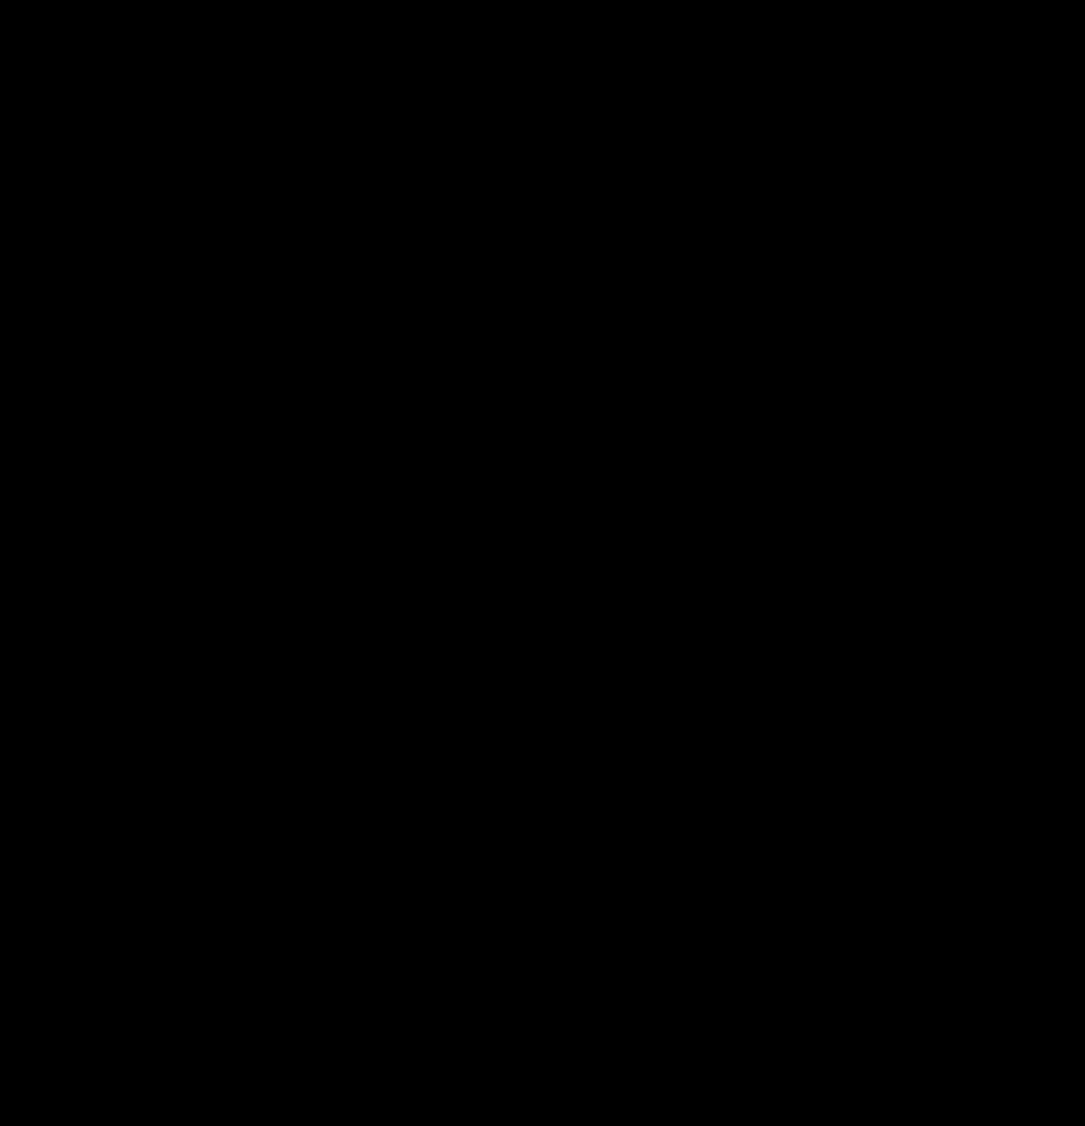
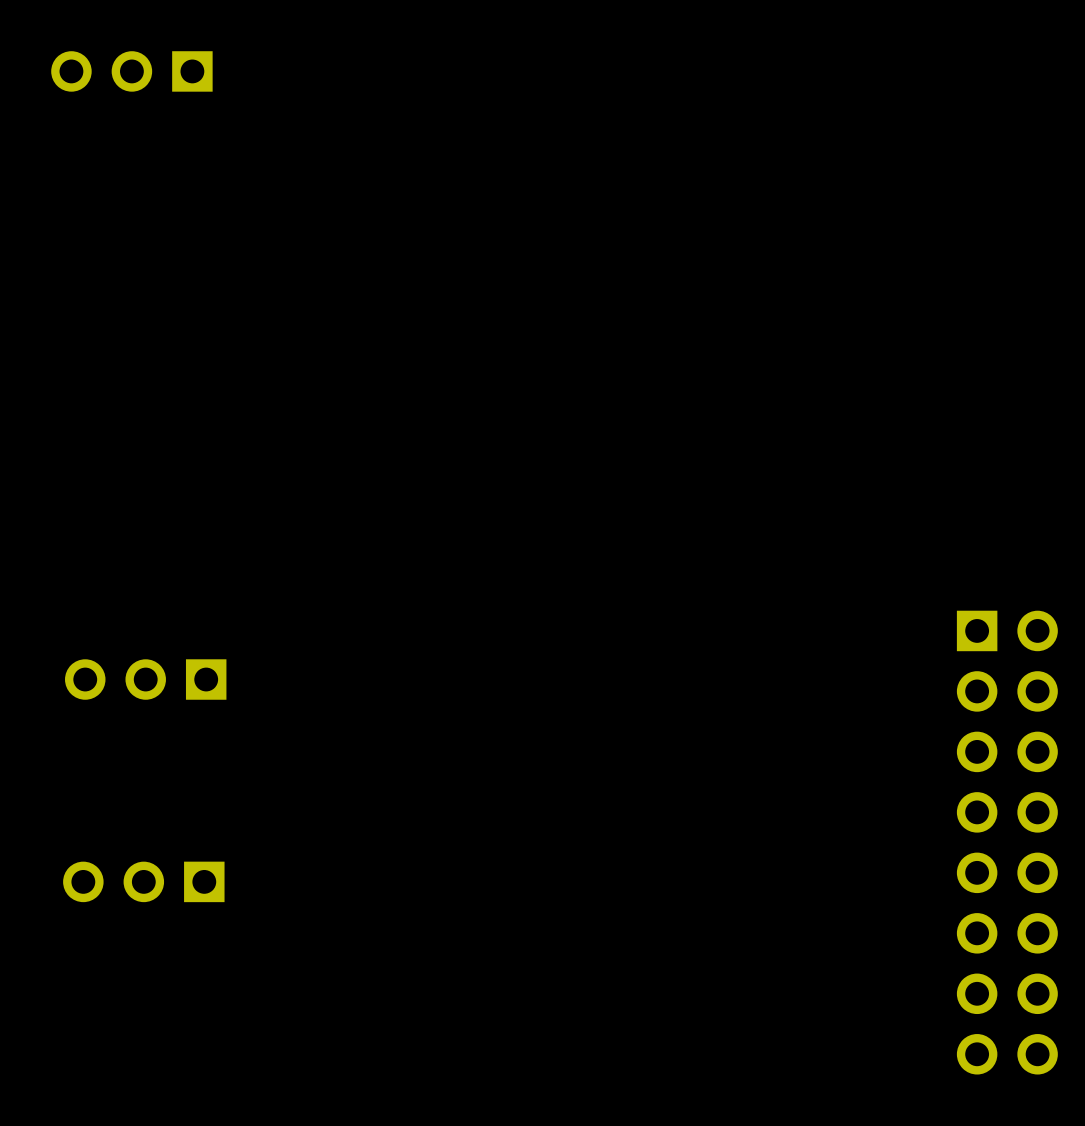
part: none -> (131, 71)
part: none -> (145, 679)
part: none -> (1007, 842)
part: none -> (143, 881)

